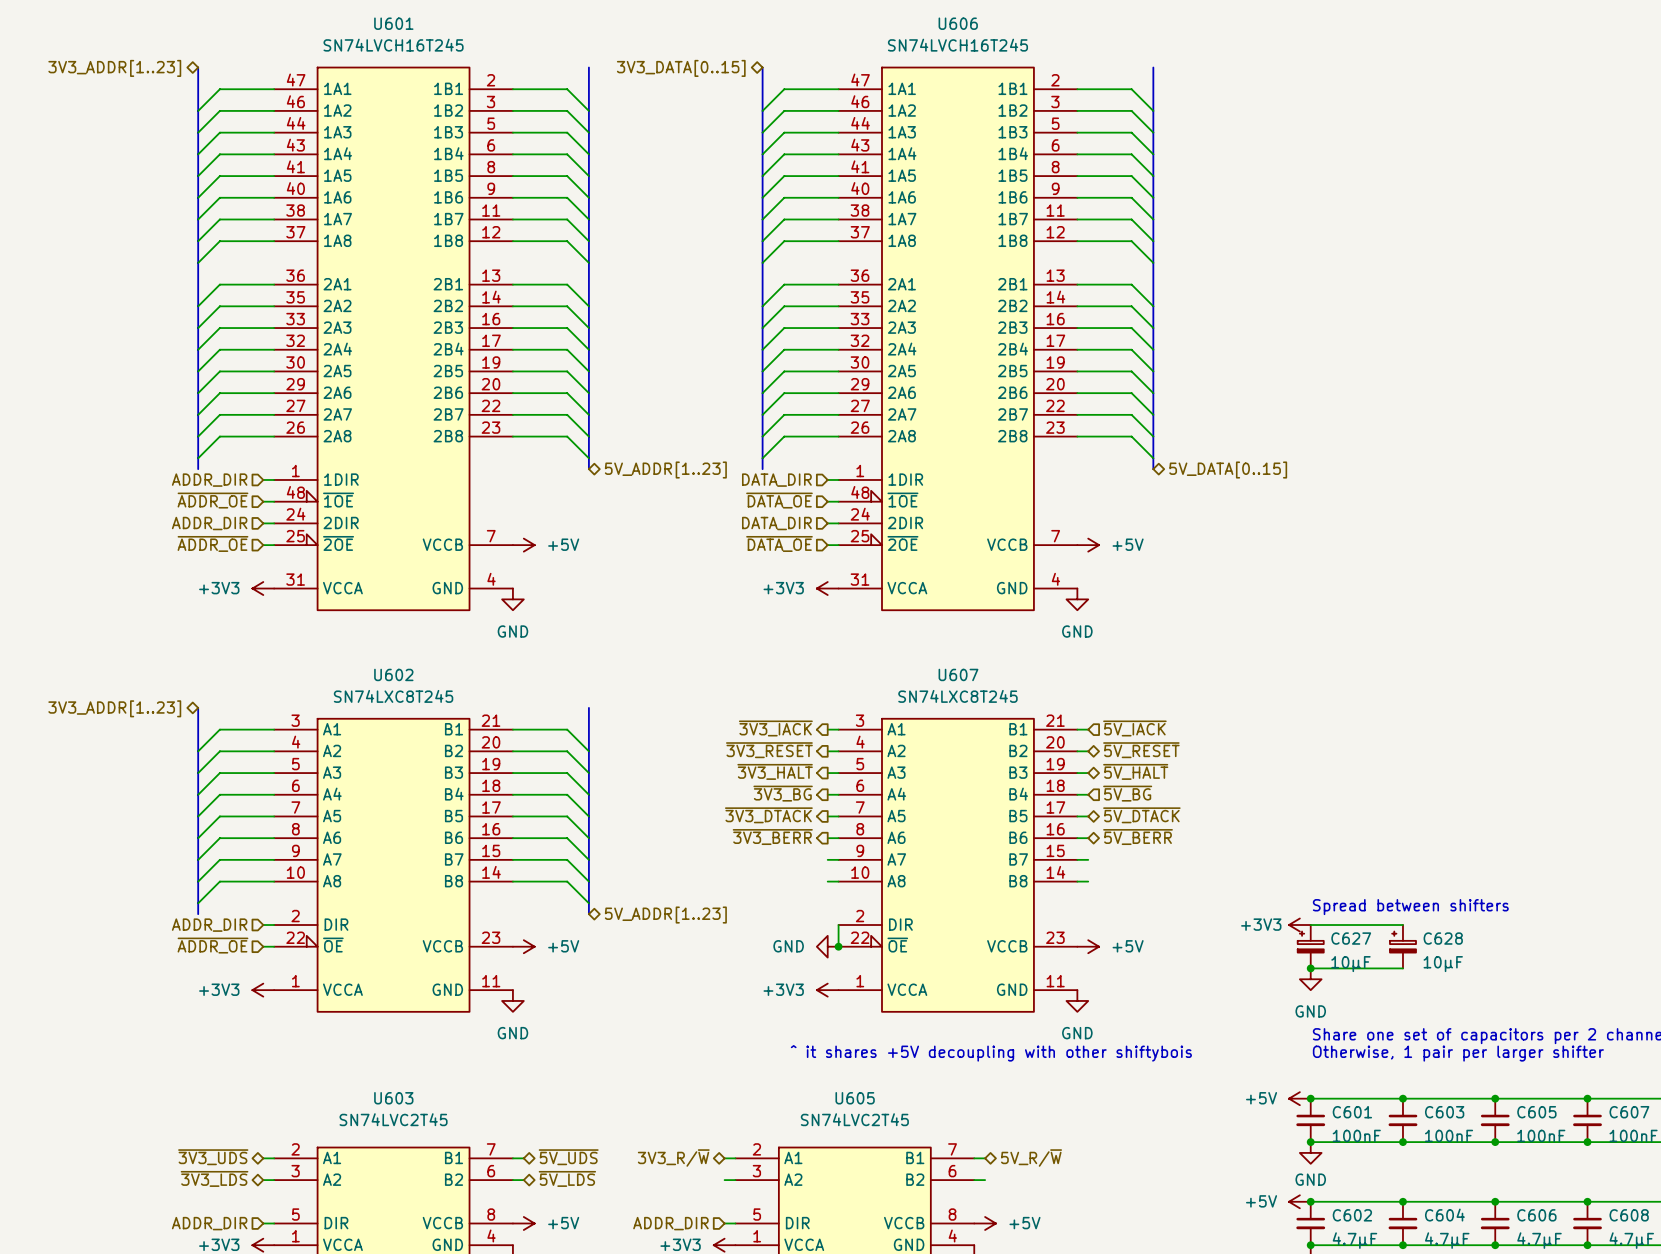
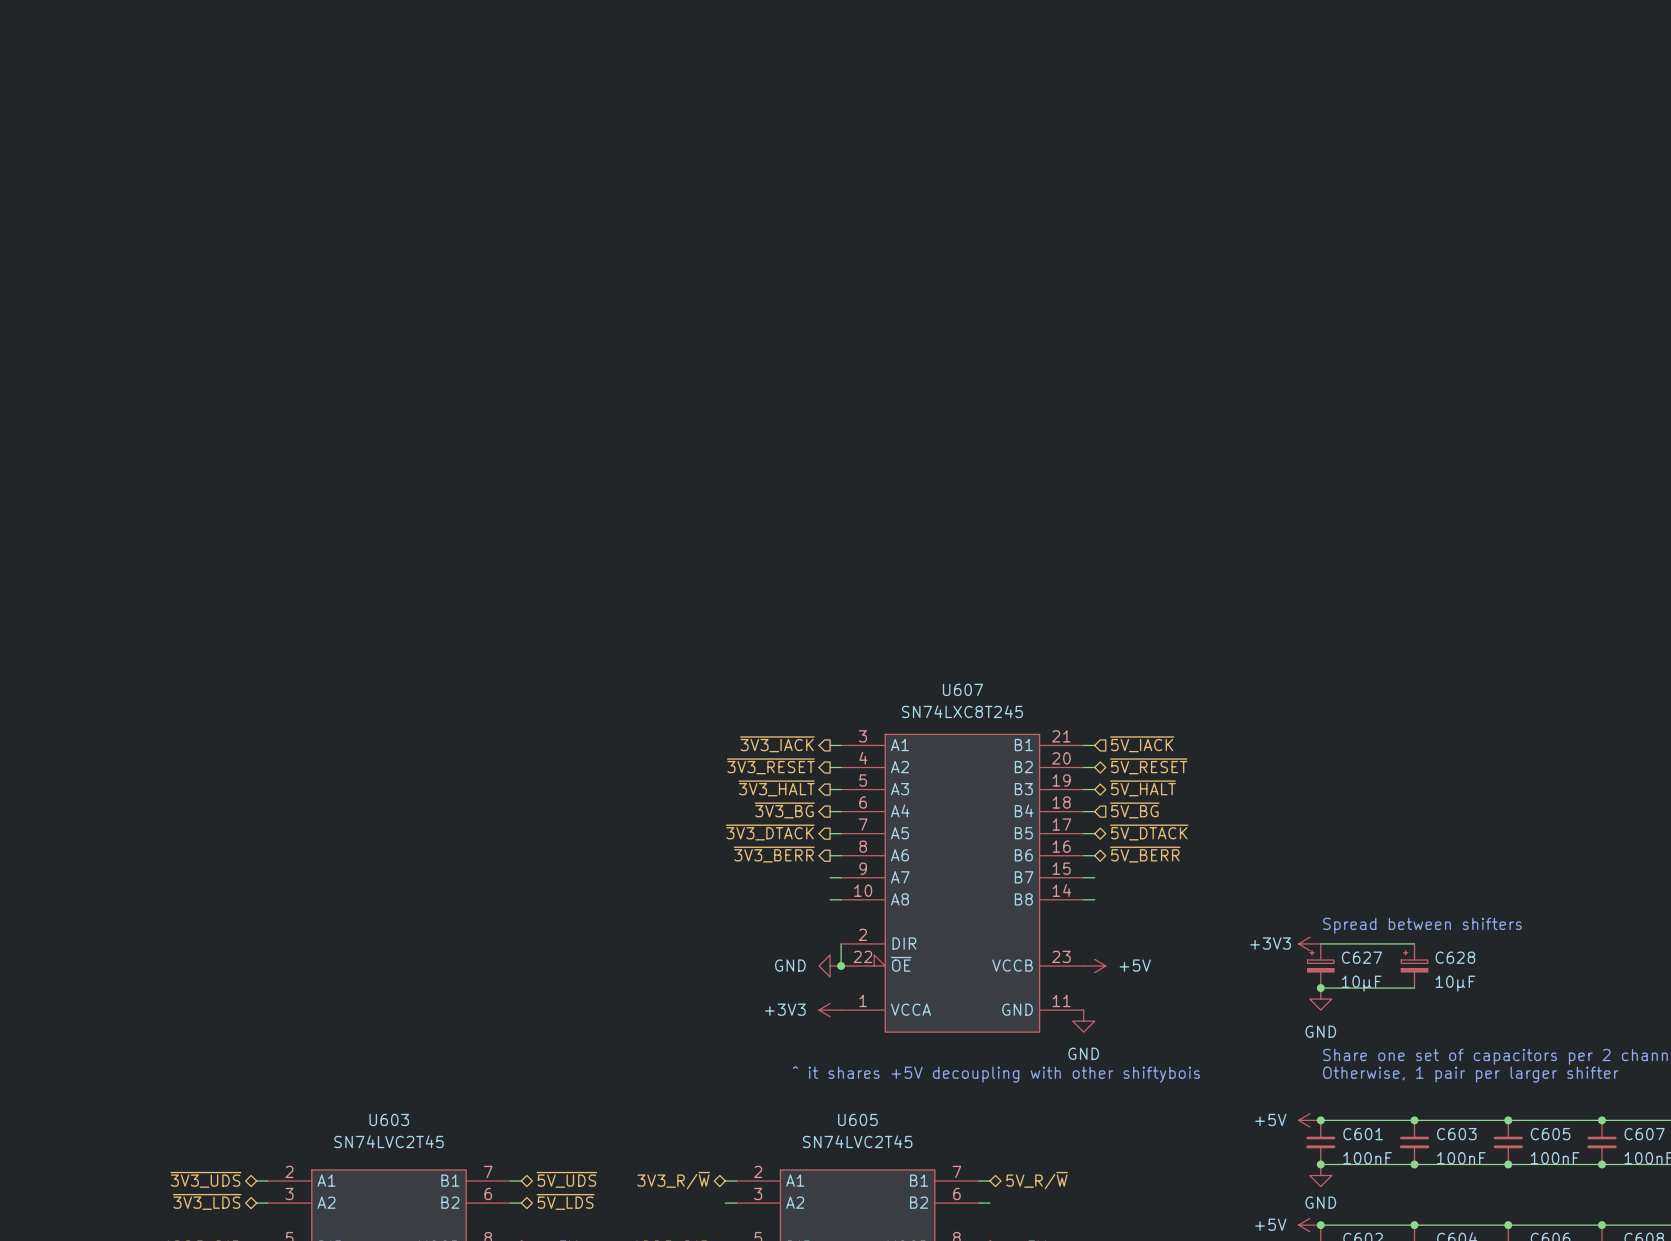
bus: (198, 67) (198, 469) -> none
bus: (588, 67) (588, 469) -> none
bus: (762, 67) (762, 469) -> none
bus: (1153, 67) (1153, 469) -> none
hierarchical label: 3V3_ADDR[1..23] (114, 68) -> none
hierarchical label: 3V3_DATA[0..15] (681, 68) -> none
wire: (274, 89) (219, 89) (198, 110) -> none
wire: (512, 89) (567, 89) (588, 110) -> none
wire: (838, 89) (784, 89) (762, 110) -> none
wire: (1077, 89) (1131, 89) (1153, 110) -> none
wire: (274, 110) (219, 110) (198, 132) -> none
wire: (512, 110) (567, 110) (588, 132) -> none
wire: (838, 110) (784, 110) (762, 132) -> none
wire: (1077, 110) (1131, 110) (1153, 132) -> none
wire: (274, 132) (219, 132) (198, 154) -> none
wire: (512, 132) (567, 132) (588, 154) -> none
wire: (838, 132) (784, 132) (762, 154) -> none
wire: (1077, 132) (1131, 132) (1153, 154) -> none
wire: (274, 154) (219, 154) (198, 176) -> none
wire: (512, 154) (567, 154) (588, 176) -> none
wire: (838, 154) (784, 154) (762, 176) -> none
wire: (1077, 154) (1131, 154) (1153, 176) -> none
wire: (274, 176) (219, 176) (198, 197) -> none
wire: (512, 176) (567, 176) (588, 197) -> none
wire: (838, 176) (784, 176) (762, 197) -> none
wire: (1077, 176) (1131, 176) (1153, 197) -> none
wire: (274, 197) (219, 197) (198, 219) -> none
wire: (512, 197) (567, 197) (588, 219) -> none
wire: (838, 197) (784, 197) (762, 219) -> none
wire: (1077, 197) (1131, 197) (1153, 219) -> none
wire: (274, 219) (219, 219) (198, 241) -> none
wire: (512, 219) (567, 219) (588, 241) -> none
wire: (838, 219) (784, 219) (762, 241) -> none
wire: (1077, 219) (1131, 219) (1153, 241) -> none
wire: (274, 241) (219, 241) (198, 262) -> none
wire: (512, 241) (567, 241) (588, 262) -> none
wire: (838, 241) (784, 241) (762, 262) -> none
wire: (1077, 241) (1131, 241) (1153, 262) -> none
wire: (274, 284) (219, 284) (198, 306) -> none
wire: (512, 284) (567, 284) (588, 306) -> none
wire: (838, 284) (784, 284) (762, 306) -> none
wire: (1077, 284) (1131, 284) (1153, 306) -> none
wire: (274, 306) (219, 306) (198, 328) -> none
wire: (512, 306) (567, 306) (588, 328) -> none
wire: (838, 306) (784, 306) (762, 328) -> none
wire: (1077, 306) (1131, 306) (1153, 328) -> none
wire: (274, 328) (219, 328) (198, 349) -> none
wire: (512, 328) (567, 328) (588, 349) -> none
wire: (838, 328) (784, 328) (762, 349) -> none
wire: (1077, 328) (1131, 328) (1153, 349) -> none
U601: SN74LVCH16T245 (393, 338) -> none
U606: SN74LVCH16T245 (957, 338) -> none
wire: (274, 349) (219, 349) (198, 371) -> none
wire: (512, 349) (567, 349) (588, 371) -> none
wire: (838, 349) (784, 349) (762, 371) -> none
wire: (1077, 349) (1131, 349) (1153, 371) -> none
wire: (274, 371) (219, 371) (198, 393) -> none
wire: (512, 371) (567, 371) (588, 393) -> none
wire: (838, 371) (784, 371) (762, 393) -> none
wire: (1077, 371) (1131, 371) (1153, 393) -> none
wire: (274, 393) (219, 393) (198, 414) -> none
wire: (512, 393) (567, 393) (588, 414) -> none
wire: (838, 393) (784, 393) (762, 414) -> none
wire: (1077, 393) (1131, 393) (1153, 414) -> none
wire: (274, 414) (219, 414) (198, 436) -> none
wire: (512, 414) (567, 414) (588, 436) -> none
wire: (838, 414) (784, 414) (762, 436) -> none
wire: (1077, 414) (1131, 414) (1153, 436) -> none
wire: (274, 436) (219, 436) (198, 458) -> none
wire: (512, 436) (567, 436) (588, 458) -> none
wire: (838, 436) (784, 436) (762, 458) -> none
wire: (1077, 436) (1131, 436) (1153, 458) -> none
hierarchical label: 5V_ADDR[1..23] (665, 470) -> none
hierarchical label: 5V_DATA[0..15] (1228, 470) -> none
wire: (263, 479) (274, 479) -> none
wire: (827, 479) (838, 479) -> none
hierarchical label: ADDR_DIR (209, 480) -> none
hierarchical label: DATA_DIR (776, 480) -> none
hierarchical label: ~{ADDR_OE} (212, 500) -> none
hierarchical label: ~{DATA_OE} (779, 500) -> none
wire: (263, 501) (274, 501) -> none
wire: (827, 501) (838, 501) -> none
hierarchical label: ADDR_DIR (209, 523) -> none
wire: (263, 523) (274, 523) -> none
hierarchical label: DATA_DIR (776, 523) -> none
wire: (827, 523) (838, 523) -> none
hierarchical label: ~{ADDR_OE} (212, 543) -> none
hierarchical label: ~{DATA_OE} (779, 543) -> none
wire: (263, 545) (274, 545) -> none
power symbol: +5V (523, 545) -> none
wire: (827, 545) (838, 545) -> none
power symbol: +5V (1088, 545) -> none
power symbol: +3V3 (263, 588) -> none
power symbol: +3V3 (827, 588) -> none
power symbol: GND (512, 599) -> none
power symbol: GND (1077, 599) -> none
bus: (198, 707) (198, 914) -> none
bus: (588, 707) (588, 914) -> none
hierarchical label: 3V3_ADDR[1..23] (114, 708) -> none
wire: (274, 729) (219, 729) (198, 751) -> none
wire: (512, 729) (567, 729) (588, 751) -> none
wire: (274, 751) (219, 751) (198, 773) -> none
wire: (512, 751) (567, 751) (588, 773) -> none
wire: (274, 773) (219, 773) (198, 794) -> none
wire: (512, 773) (567, 773) (588, 794) -> none
wire: (274, 794) (219, 794) (198, 816) -> none
wire: (512, 794) (567, 794) (588, 816) -> none
wire: (274, 816) (219, 816) (198, 838) -> none
wire: (512, 816) (567, 816) (588, 838) -> none
wire: (274, 838) (219, 838) (198, 859) -> none
wire: (512, 838) (567, 838) (588, 859) -> none
wire: (274, 859) (219, 859) (198, 881) -> none
wire: (512, 859) (567, 859) (588, 881) -> none
U602: SN74LXC8T245 (393, 865) -> none
wire: (274, 881) (219, 881) (198, 903) -> none
wire: (512, 881) (567, 881) (588, 903) -> none
hierarchical label: 5V_ADDR[1..23] (665, 915) -> none
hierarchical label: ADDR_DIR (209, 925) -> none
wire: (263, 925) (274, 925) -> none
hierarchical label: ~{ADDR_OE} (212, 945) -> none
wire: (263, 946) (274, 946) -> none
power symbol: +5V (523, 946) -> none
power symbol: +3V3 (263, 990) -> none
power symbol: GND (512, 1000) -> none

